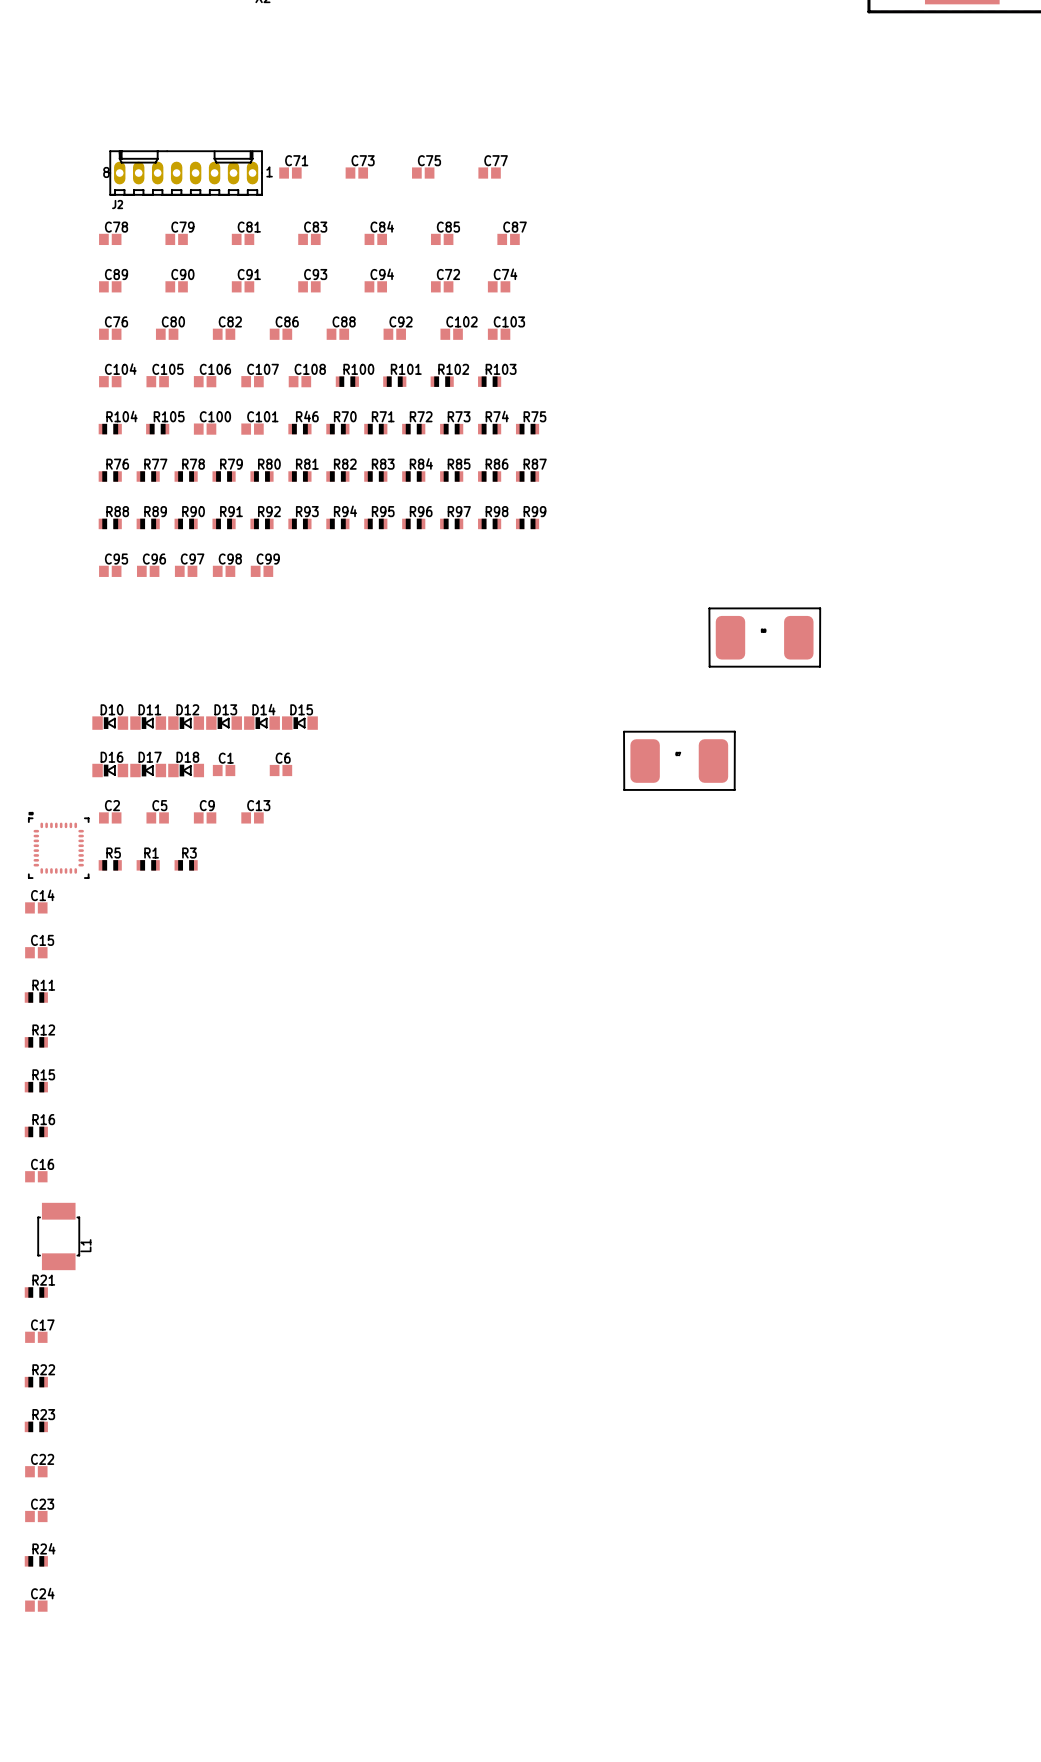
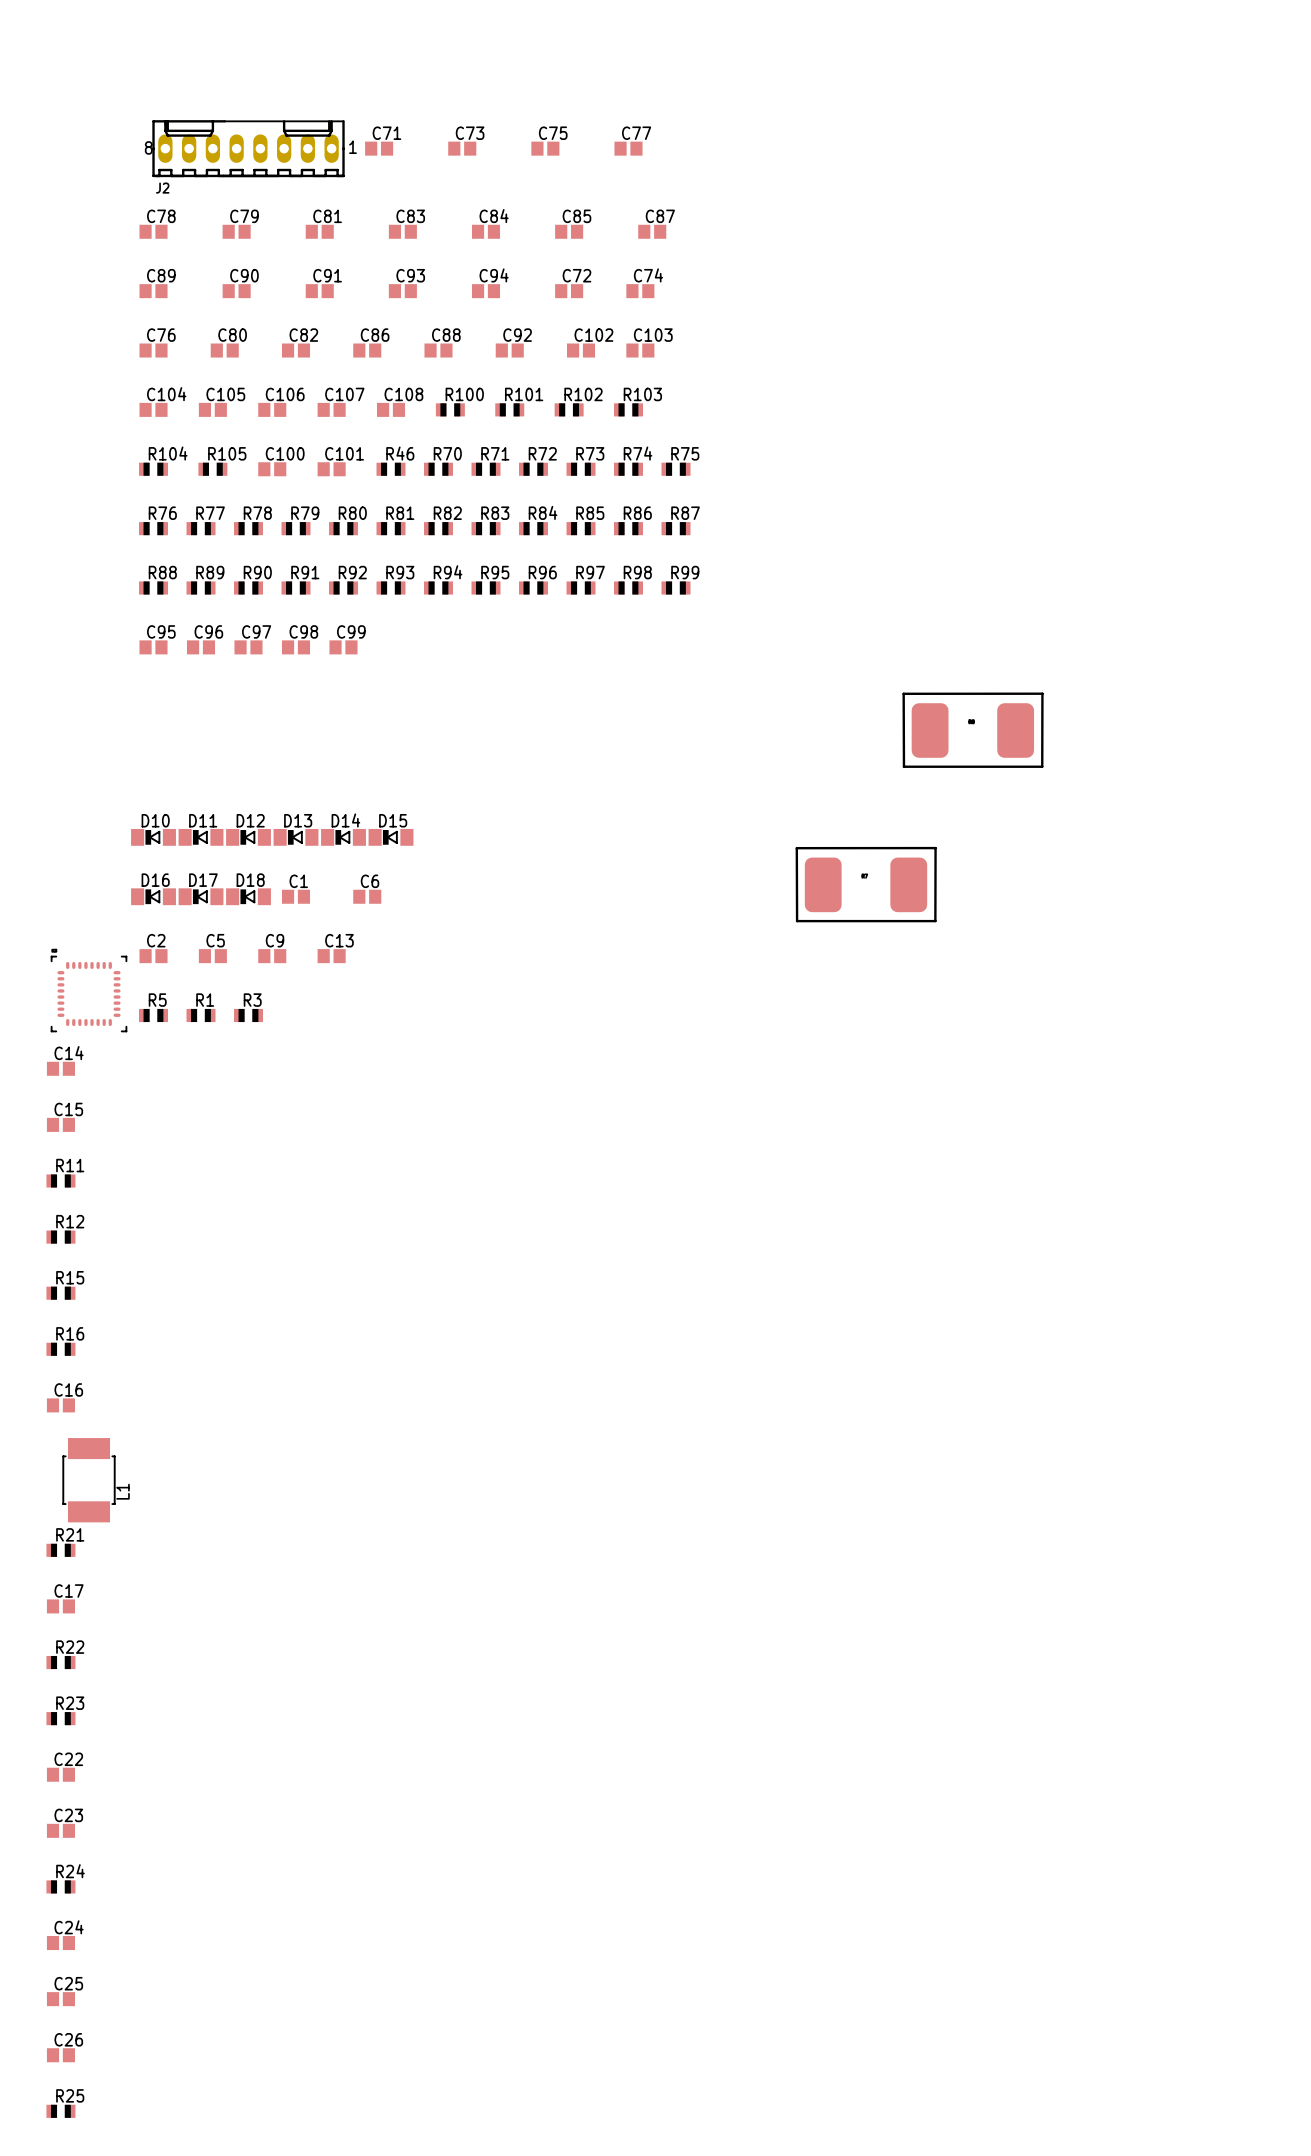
C25: none -> (60, 1999)
C26: none -> (60, 2055)
R25: none -> (60, 2111)

